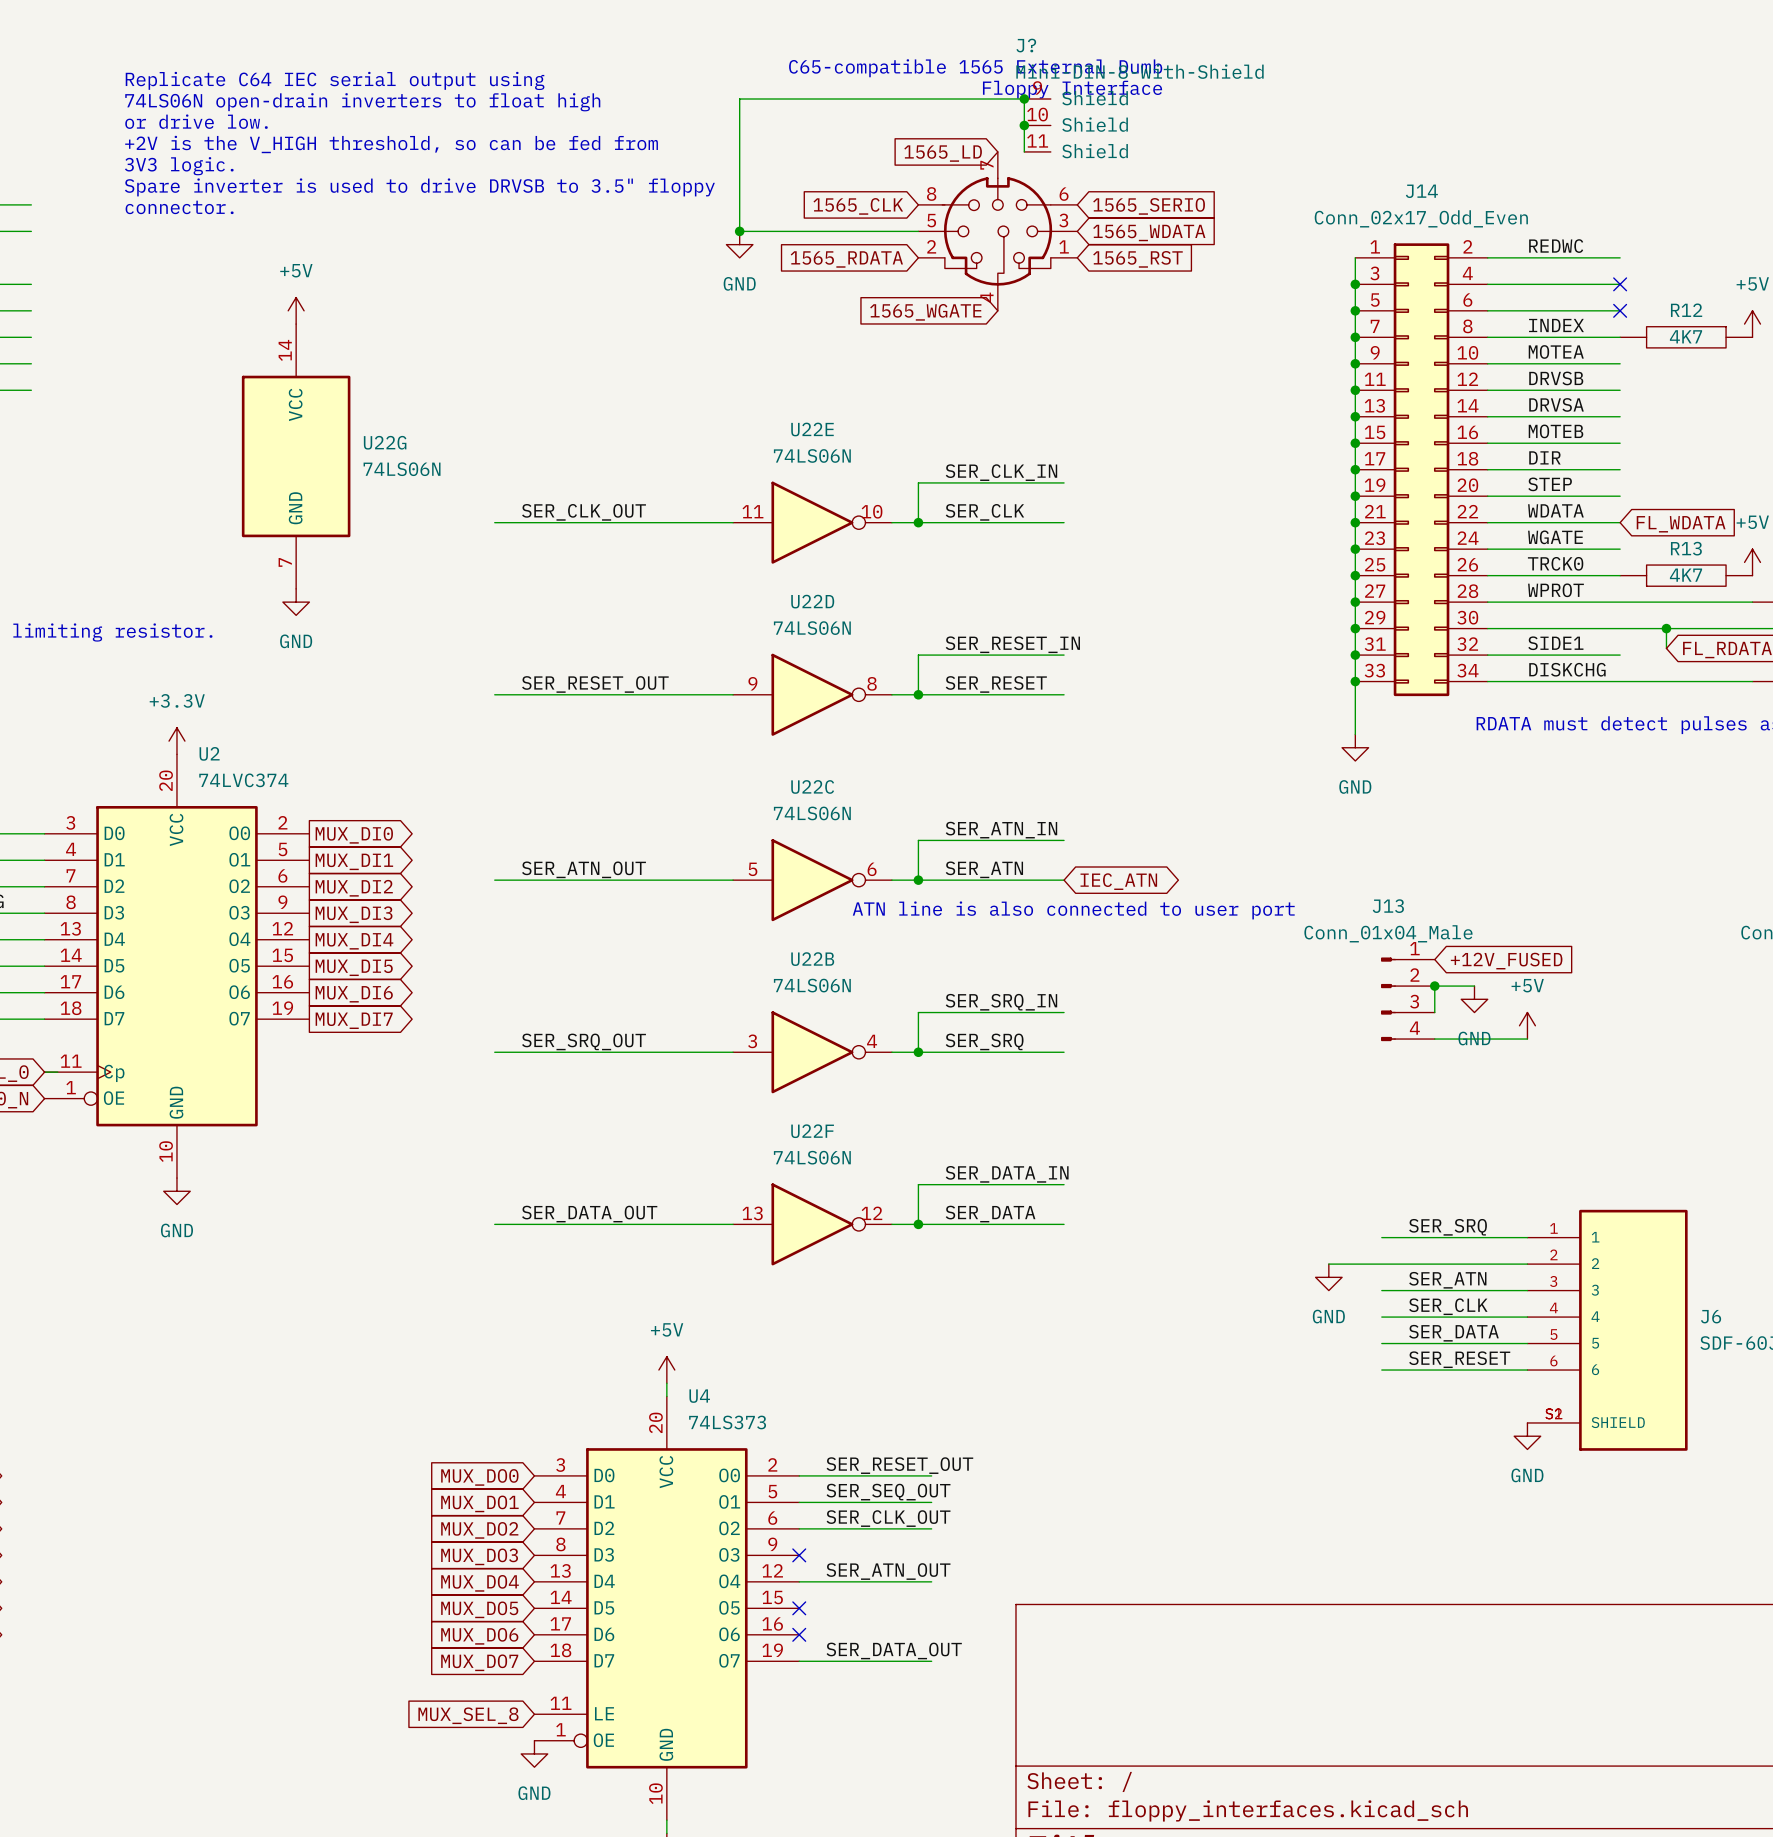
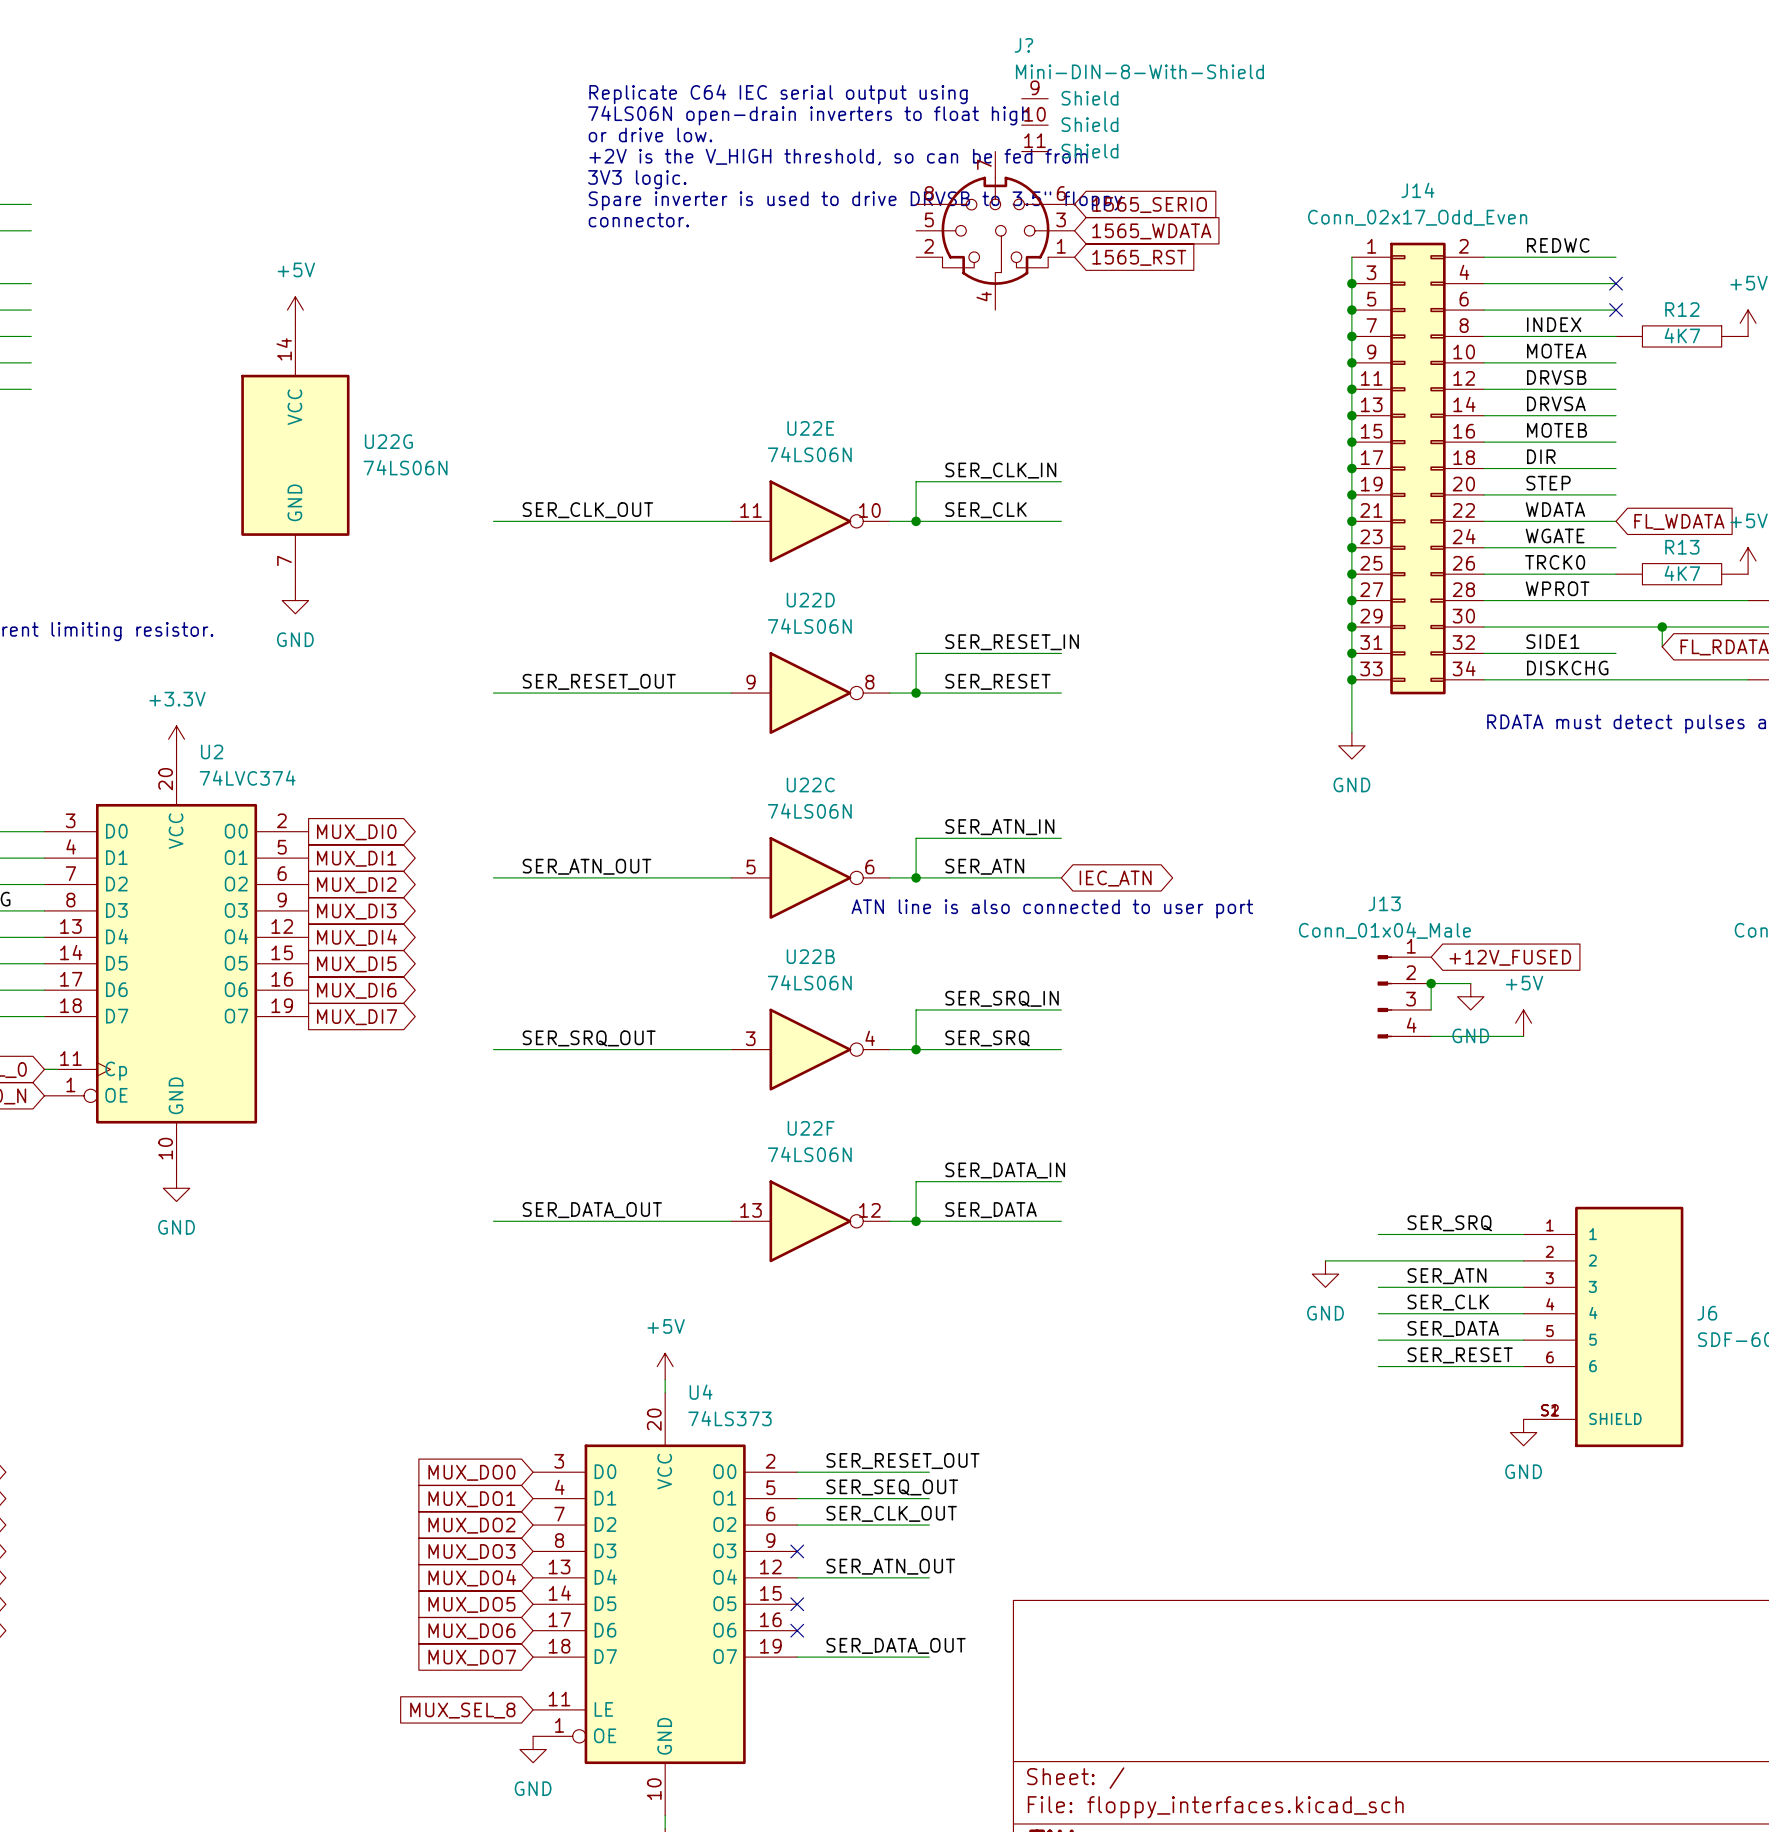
text: C65-compatible 1565 External Dumb (975, 68) -> none
text: Replicate C64 IEC serial output using (335, 80) -> none
text: Floppy Interface (1072, 89) -> none
text: none -> Replicate C64 IEC serial output using (778, 94)
junction: (1024, 98) -> none
text: 74LS06N open-drain inverters to float high (362, 102) -> none
text: none -> 74LS06N open-drain inverters to float high (808, 115)
text: or drive low. (196, 121) -> none
junction: (1024, 125) -> none
text: none -> or drive low. (650, 134)
text: +2V is the V_HIGH threshold, so can be fed from (391, 144) -> none
wire: (1024, 151) (1024, 98) (739, 98) (739, 231) (918, 231) -> none
global label: 1565_LD (943, 153) -> none
text: none -> +2V is the V_HIGH threshold, so can be fed from (838, 157)
text: 3V3 logic. (179, 166) -> none
text: none -> 3V3 logic. (637, 179)
text: Spare inverter is used to drive DRVSB to 3.5" floppy (419, 187) -> none
text: none -> Spare inverter is used to drive DRVSB to 3.5" floppy (855, 200)
global label: 1565_CLK (858, 206) -> none
text: connector. (179, 207) -> none
text: none -> connector. (638, 219)
junction: (739, 231) -> none
power symbol: GND (739, 244) -> none
global label: 1565_RDATA (846, 259) -> none
global label: 1565_WGATE (925, 312) -> none

